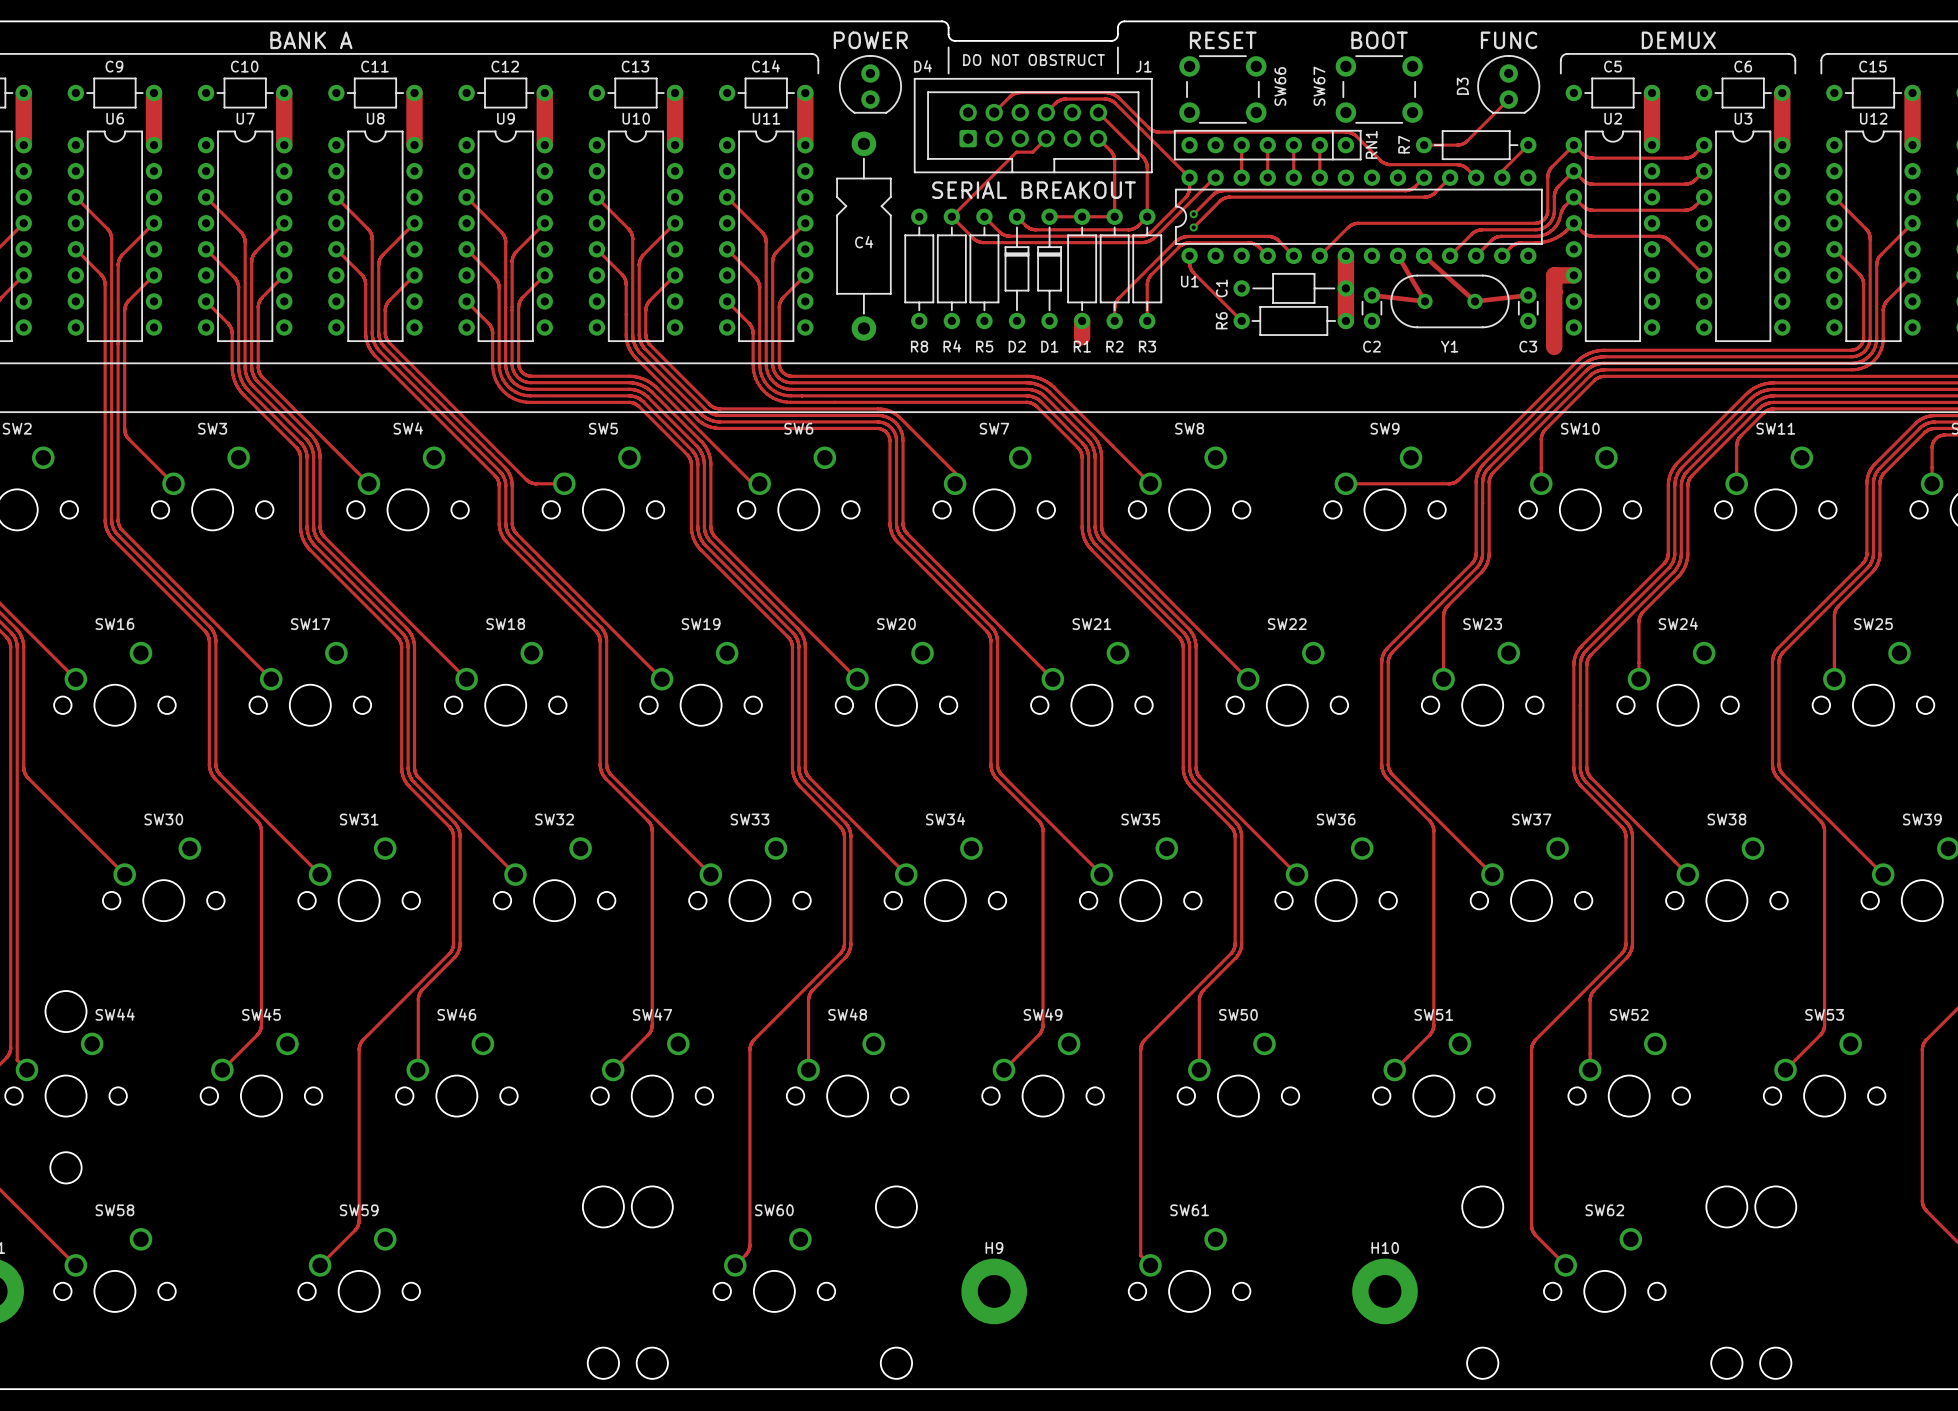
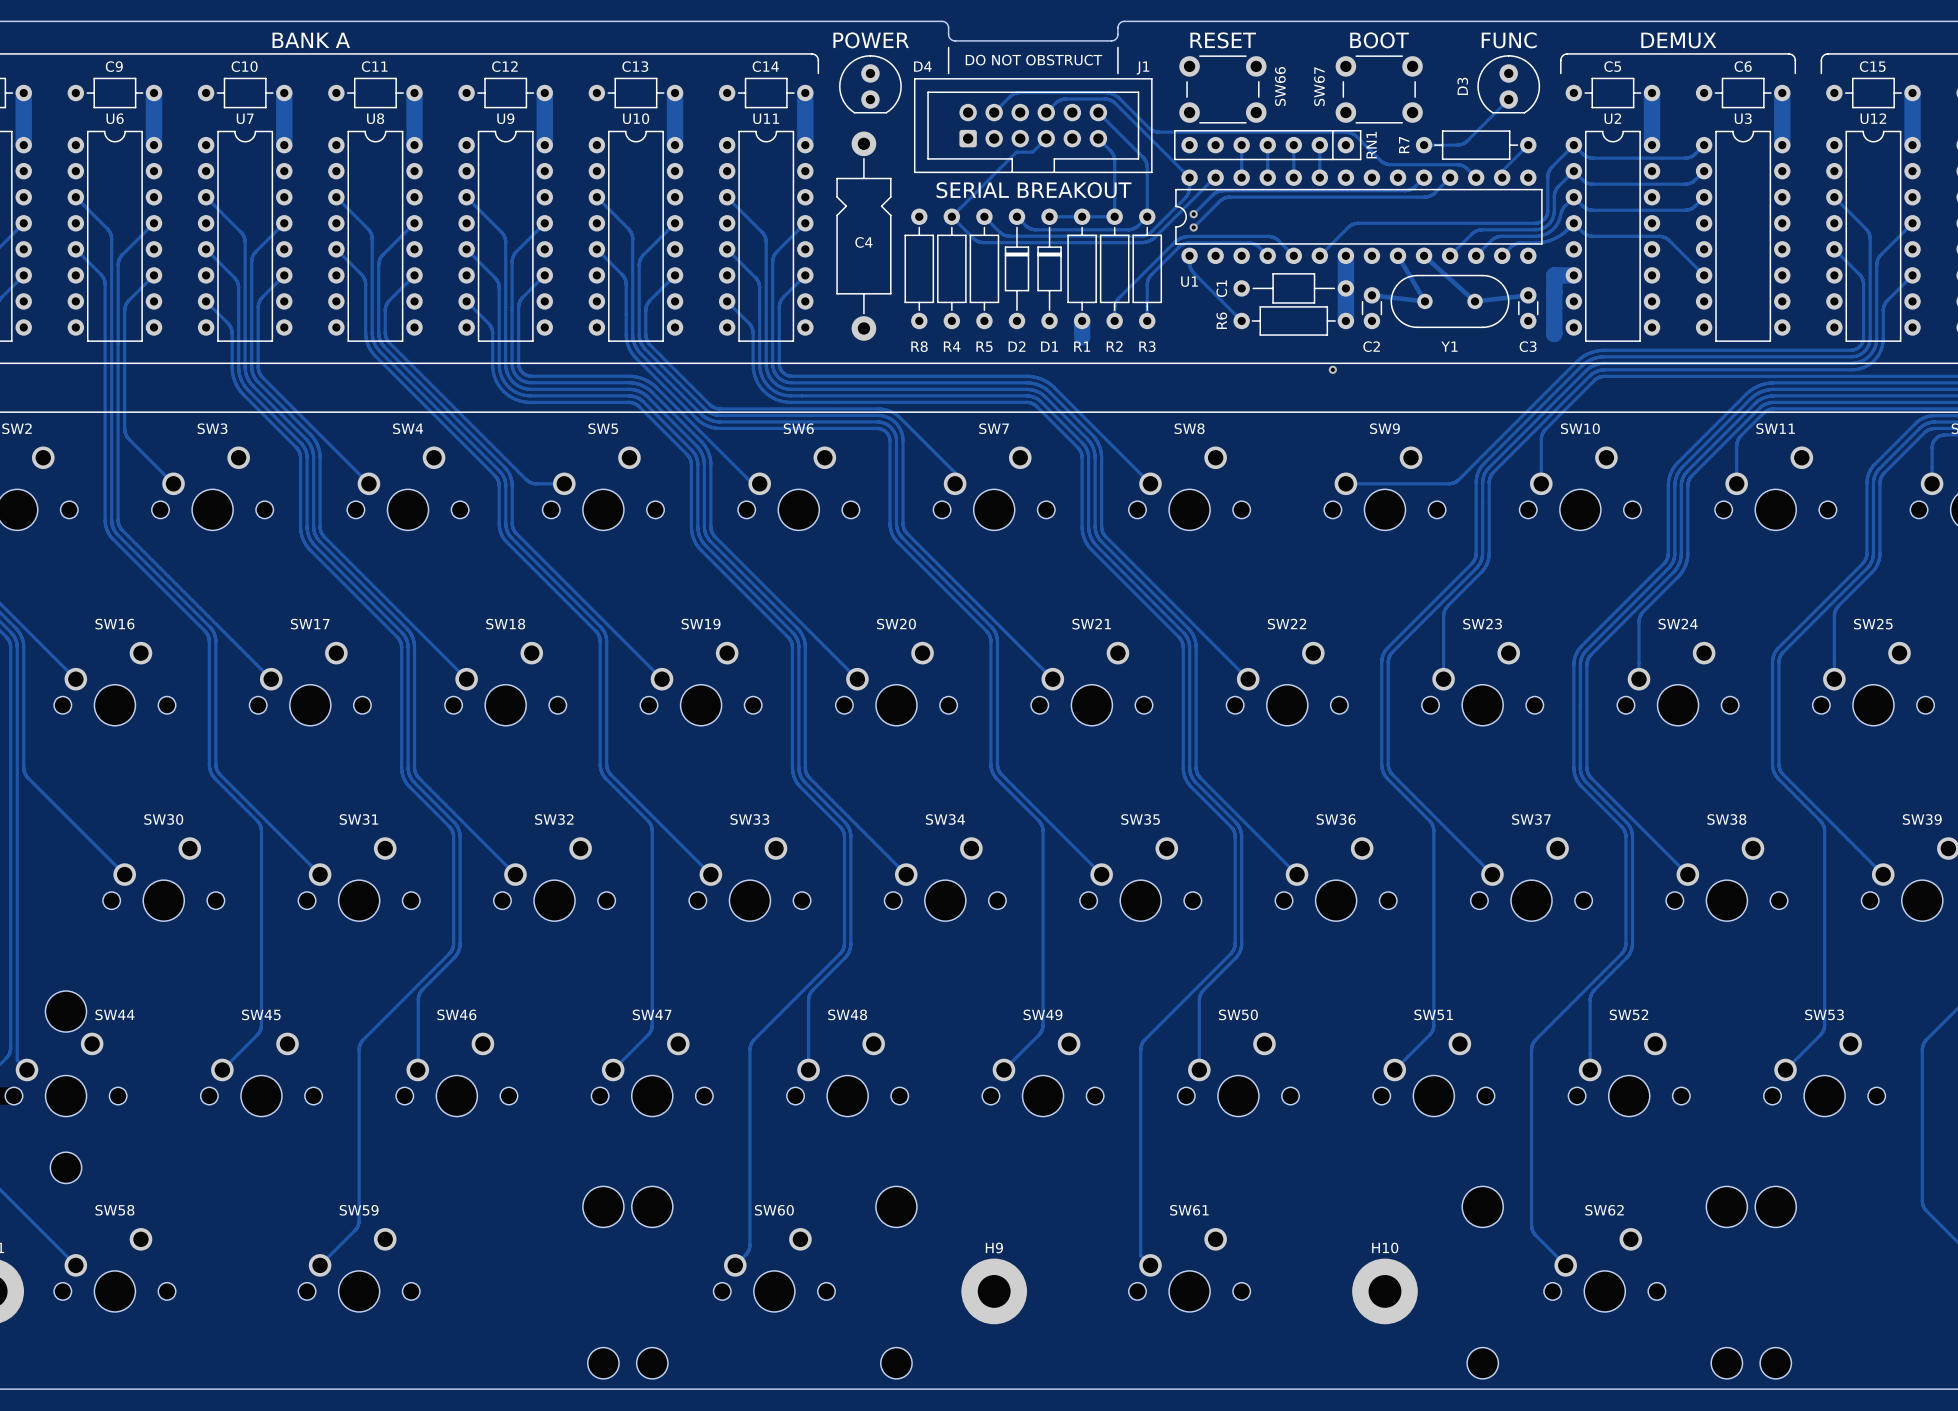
track: (1554, 333) (1554, 346) -> none
via: none -> (1332, 369)

